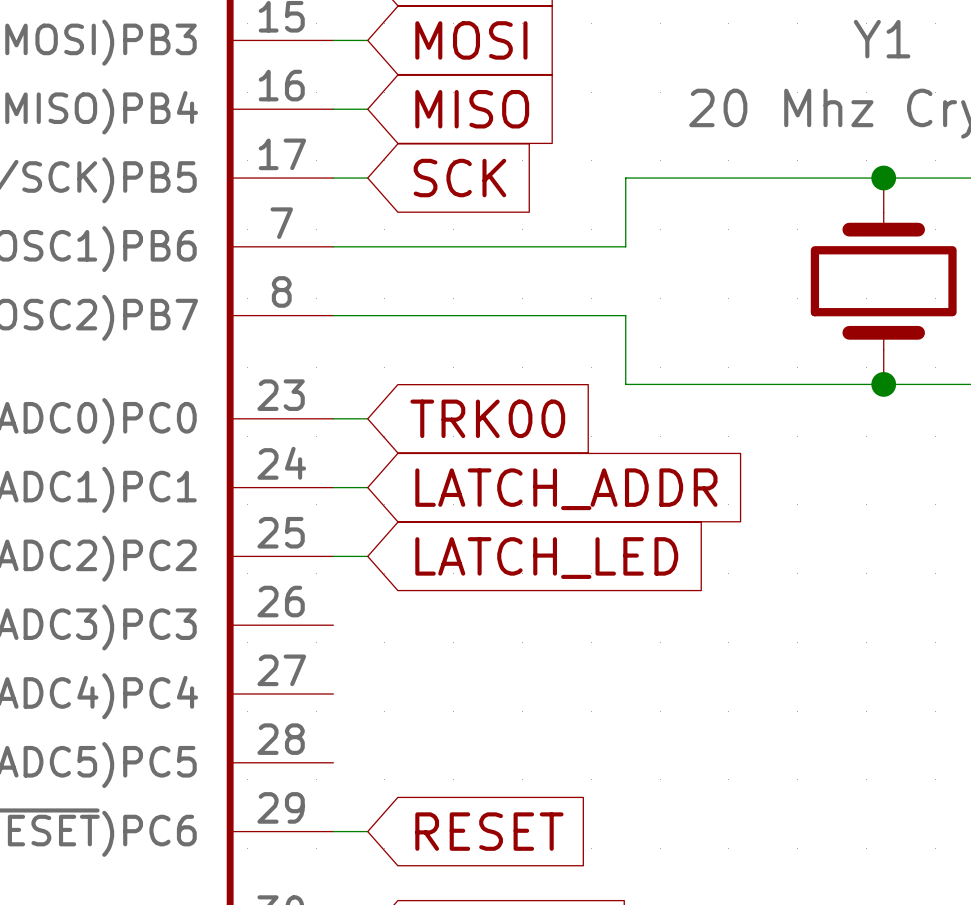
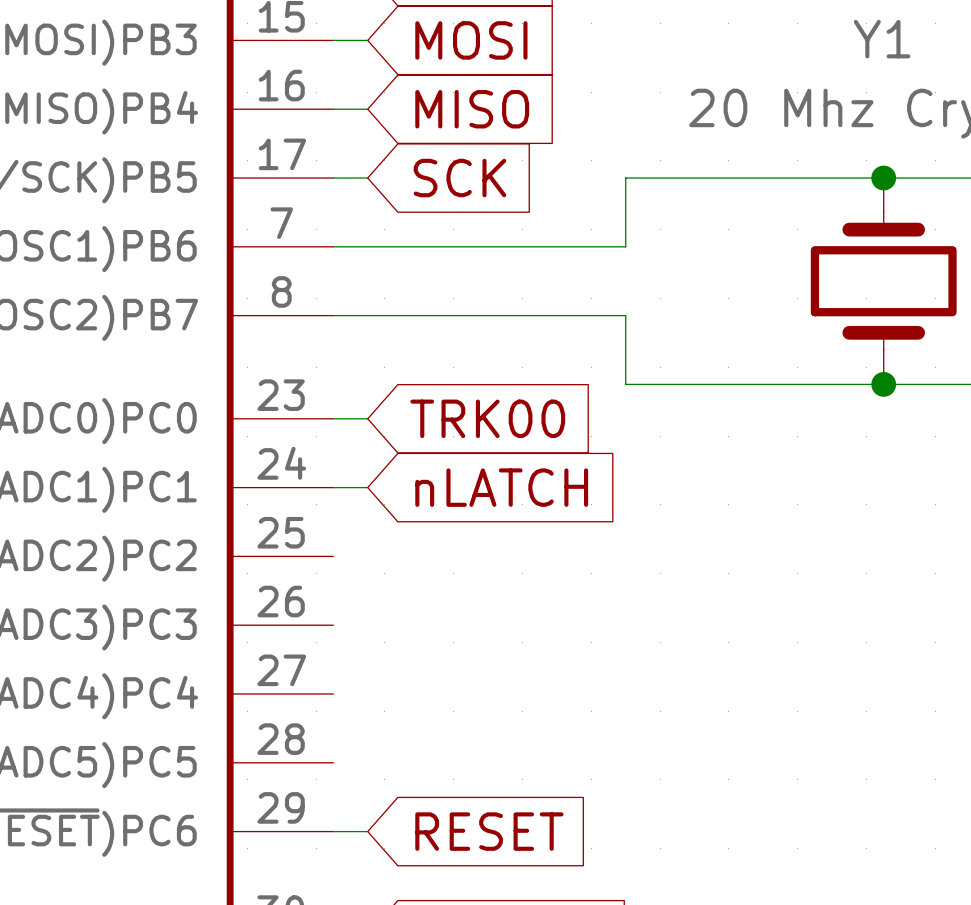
global label: LATCH_ADDR (566, 489) -> nLATCH (501, 487)
wire: (333, 556) (367, 556) -> none
global label: LATCH_LED (546, 558) -> none

